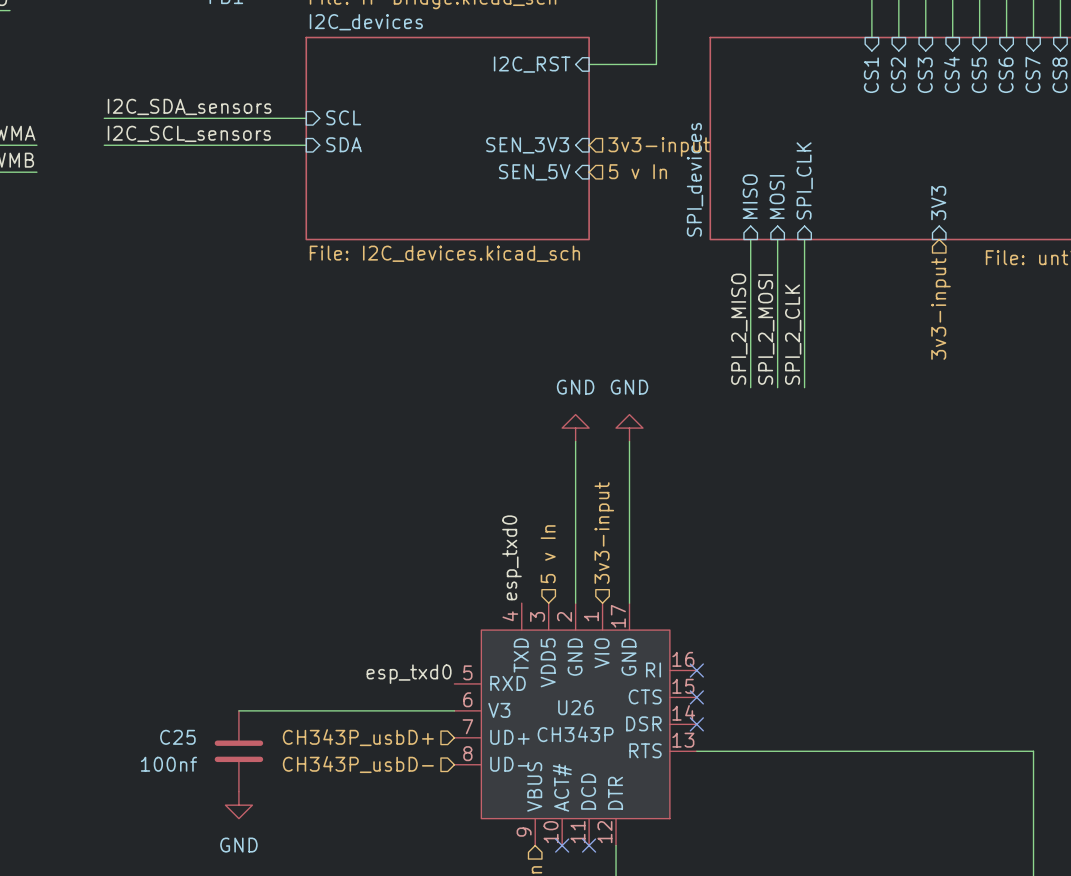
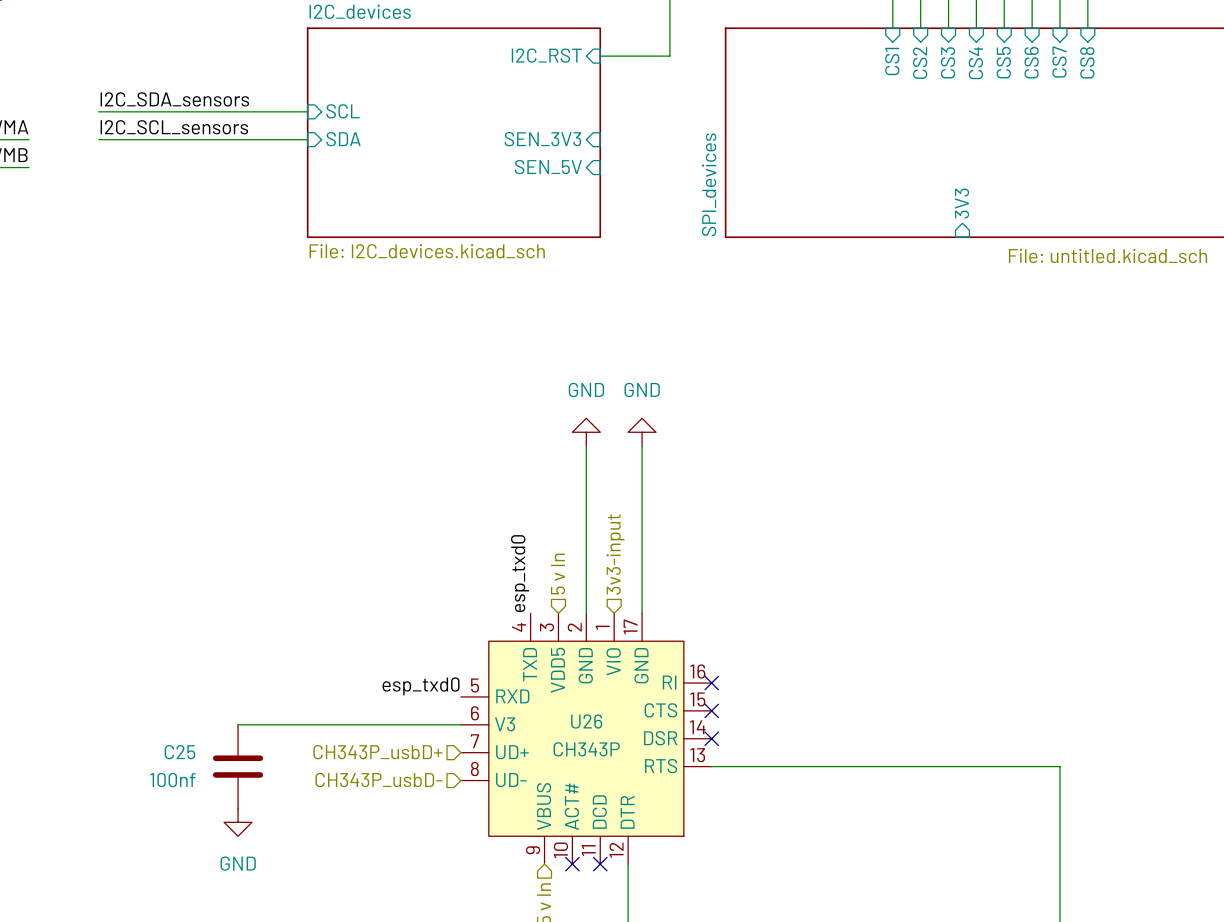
hierarchical label: 3v3-input (659, 147) -> none
hierarchical label: 5 v In (638, 171) -> none
sheet pin: SPI_CLK (804, 180) -> none
sheet pin: MISO (750, 196) -> none
sheet pin: MOSI (777, 196) -> none
wire: (750, 239) (750, 387) -> none
wire: (777, 239) (777, 387) -> none
wire: (804, 239) (804, 387) -> none
hierarchical label: 3v3-input (940, 309) -> none
label: SPI_2_MISO (739, 329) -> none
label: SPI_2_MOSI (766, 329) -> none
label: SPI_2_CLK (793, 334) -> none

